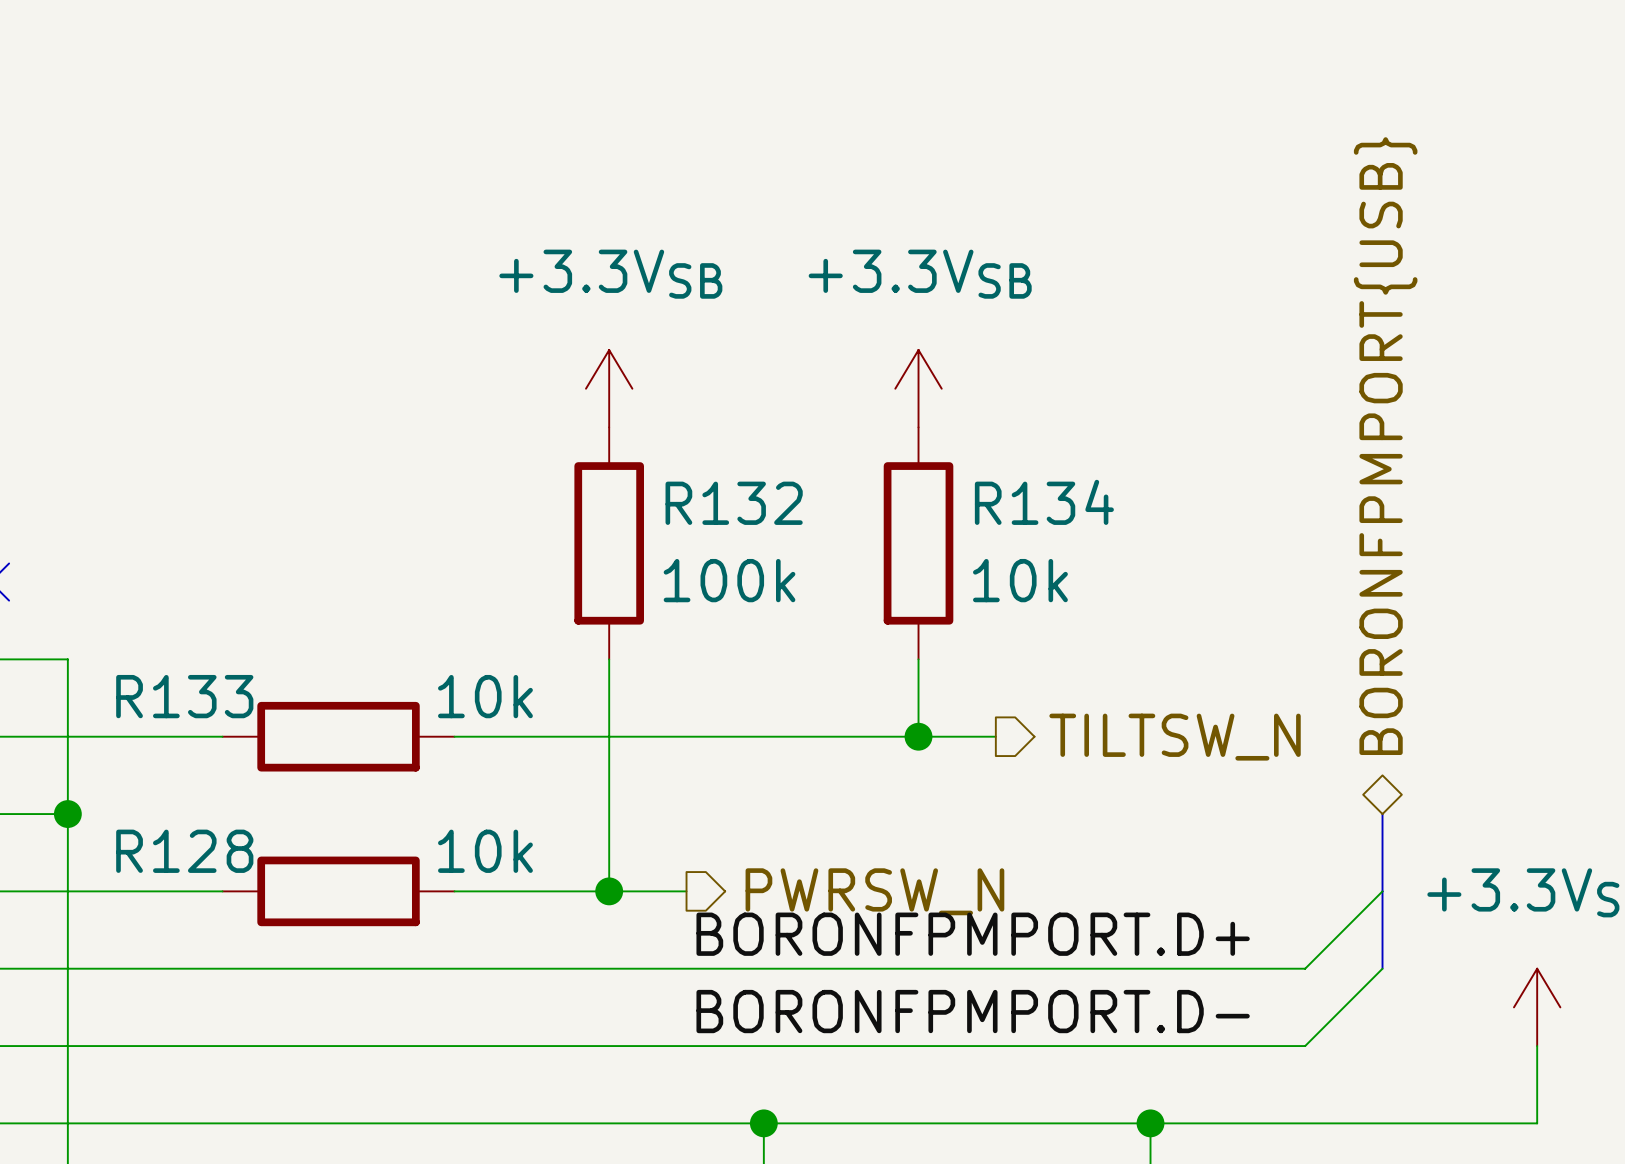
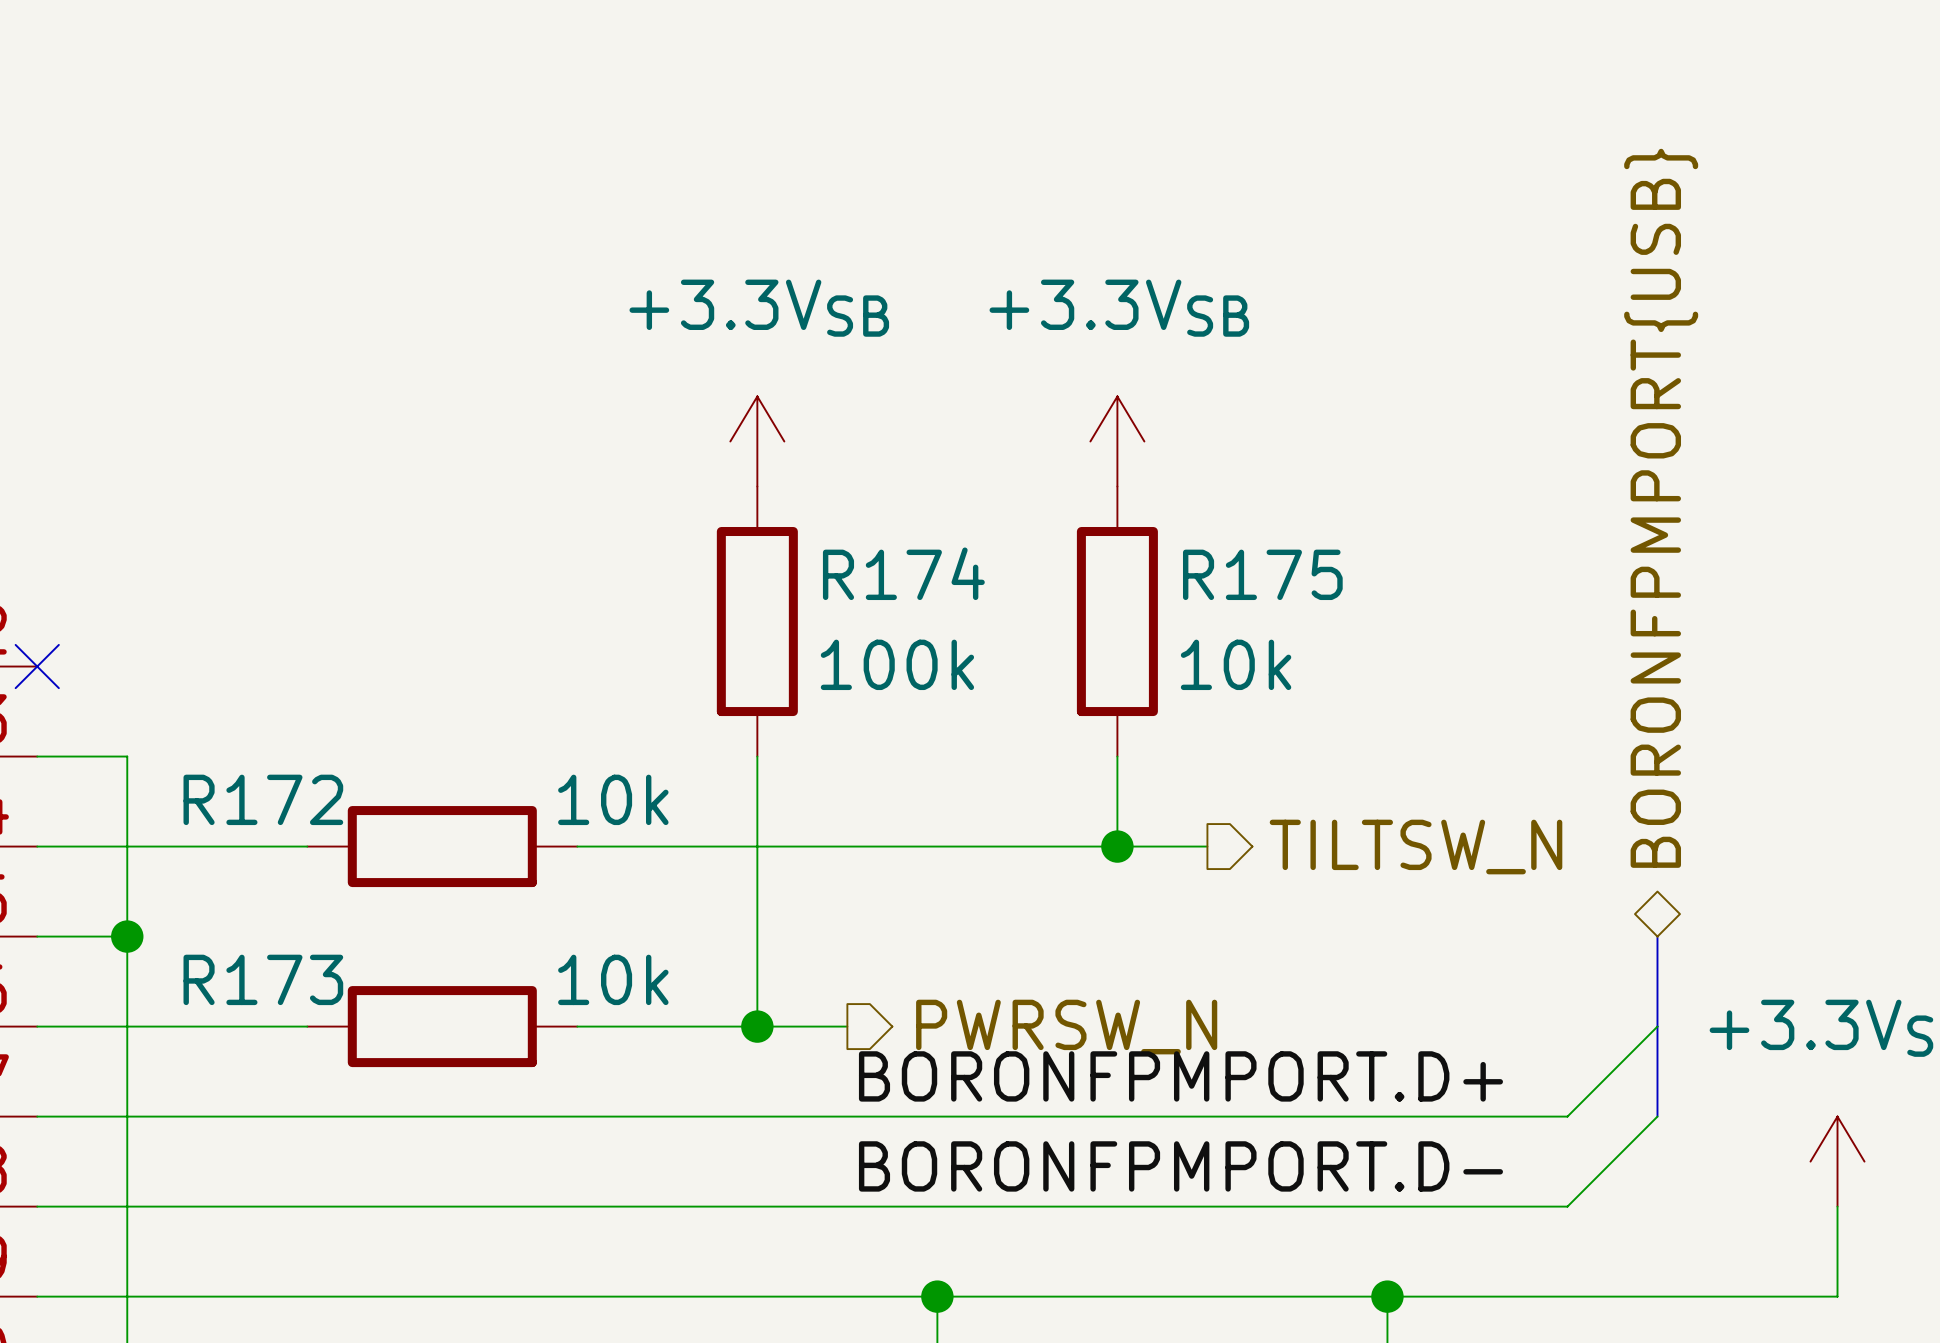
R134 name: R134 (1044, 502) -> R175 (1262, 574)
R132 name: R132 (734, 503) -> R174 (903, 573)
R133 name: R133 (184, 696) -> R172 (263, 799)
R128 name: R128 (184, 851) -> R173 (263, 979)

